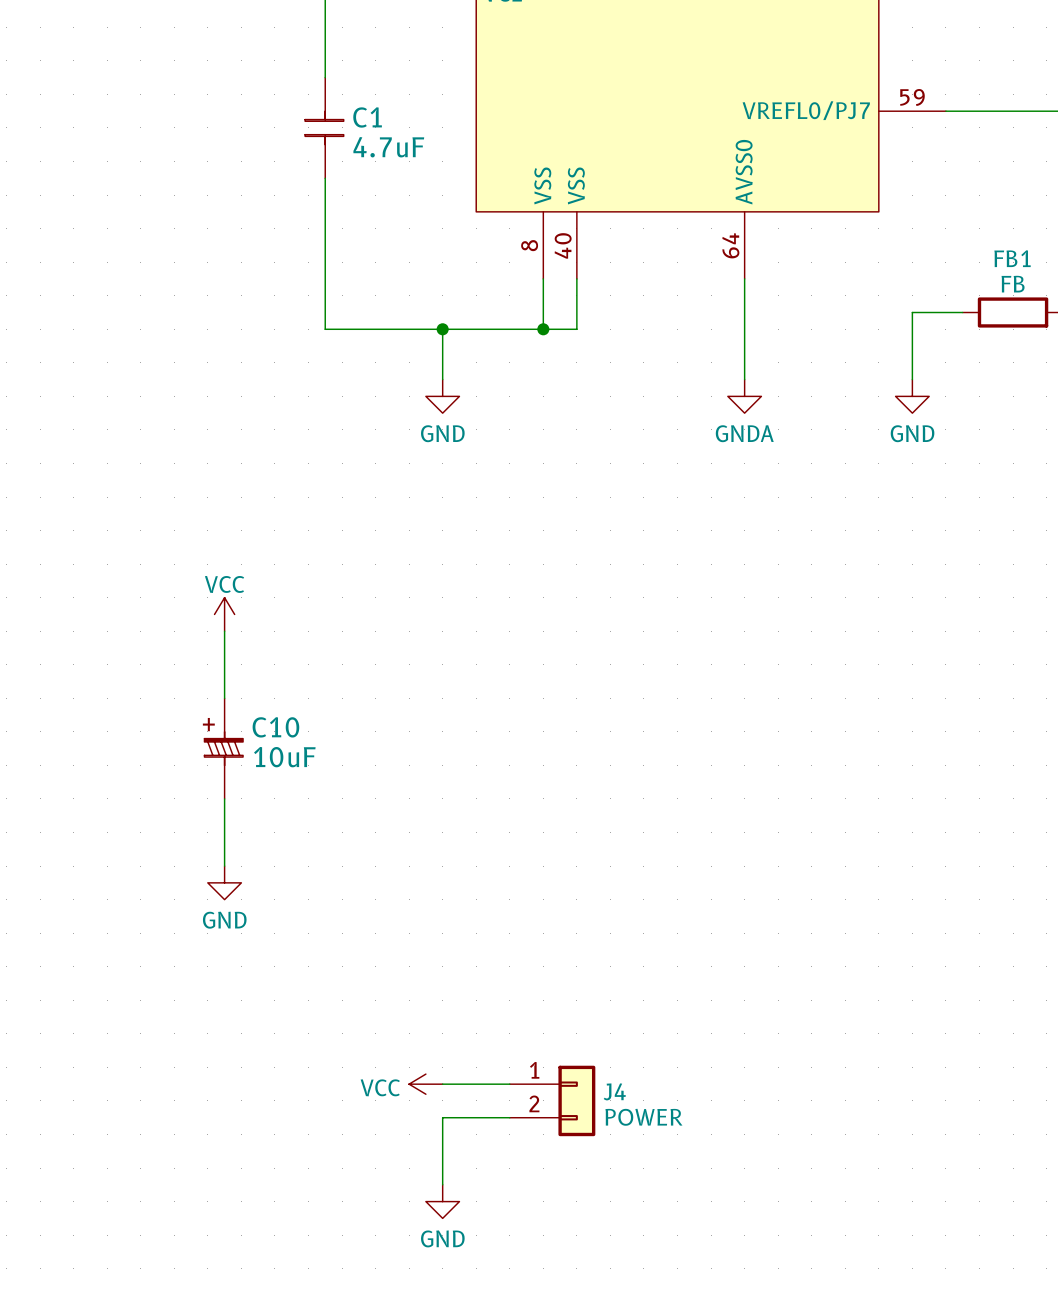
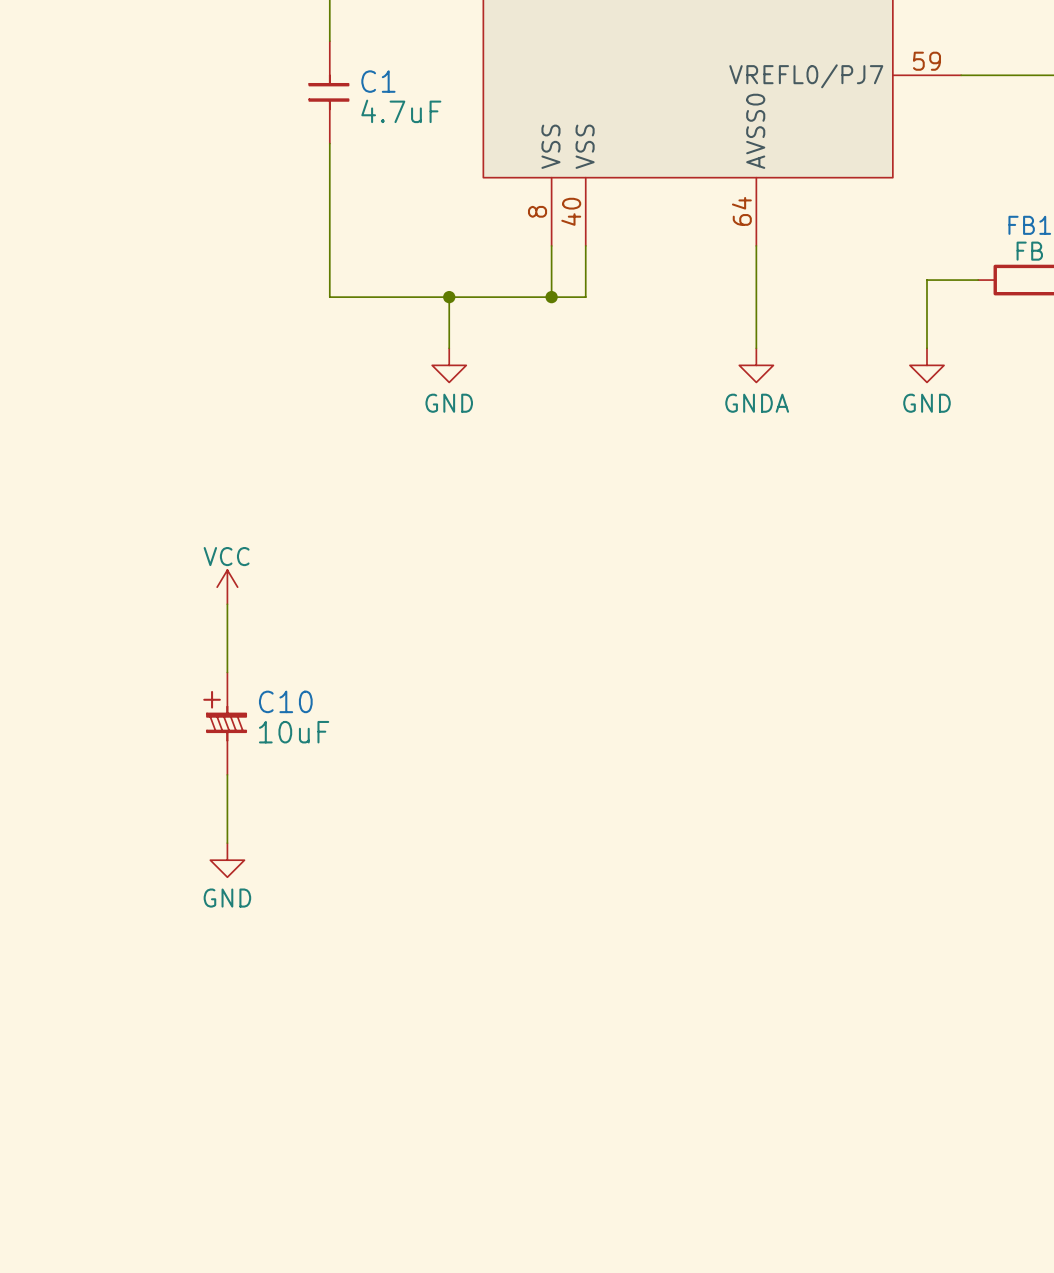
power symbol: VCC (425, 1084) -> none
wire: (442, 1084) (509, 1084) -> none
J4: POWER (552, 1100) -> none
wire: (509, 1117) (442, 1117) (442, 1184) -> none
power symbol: GND (442, 1201) -> none

